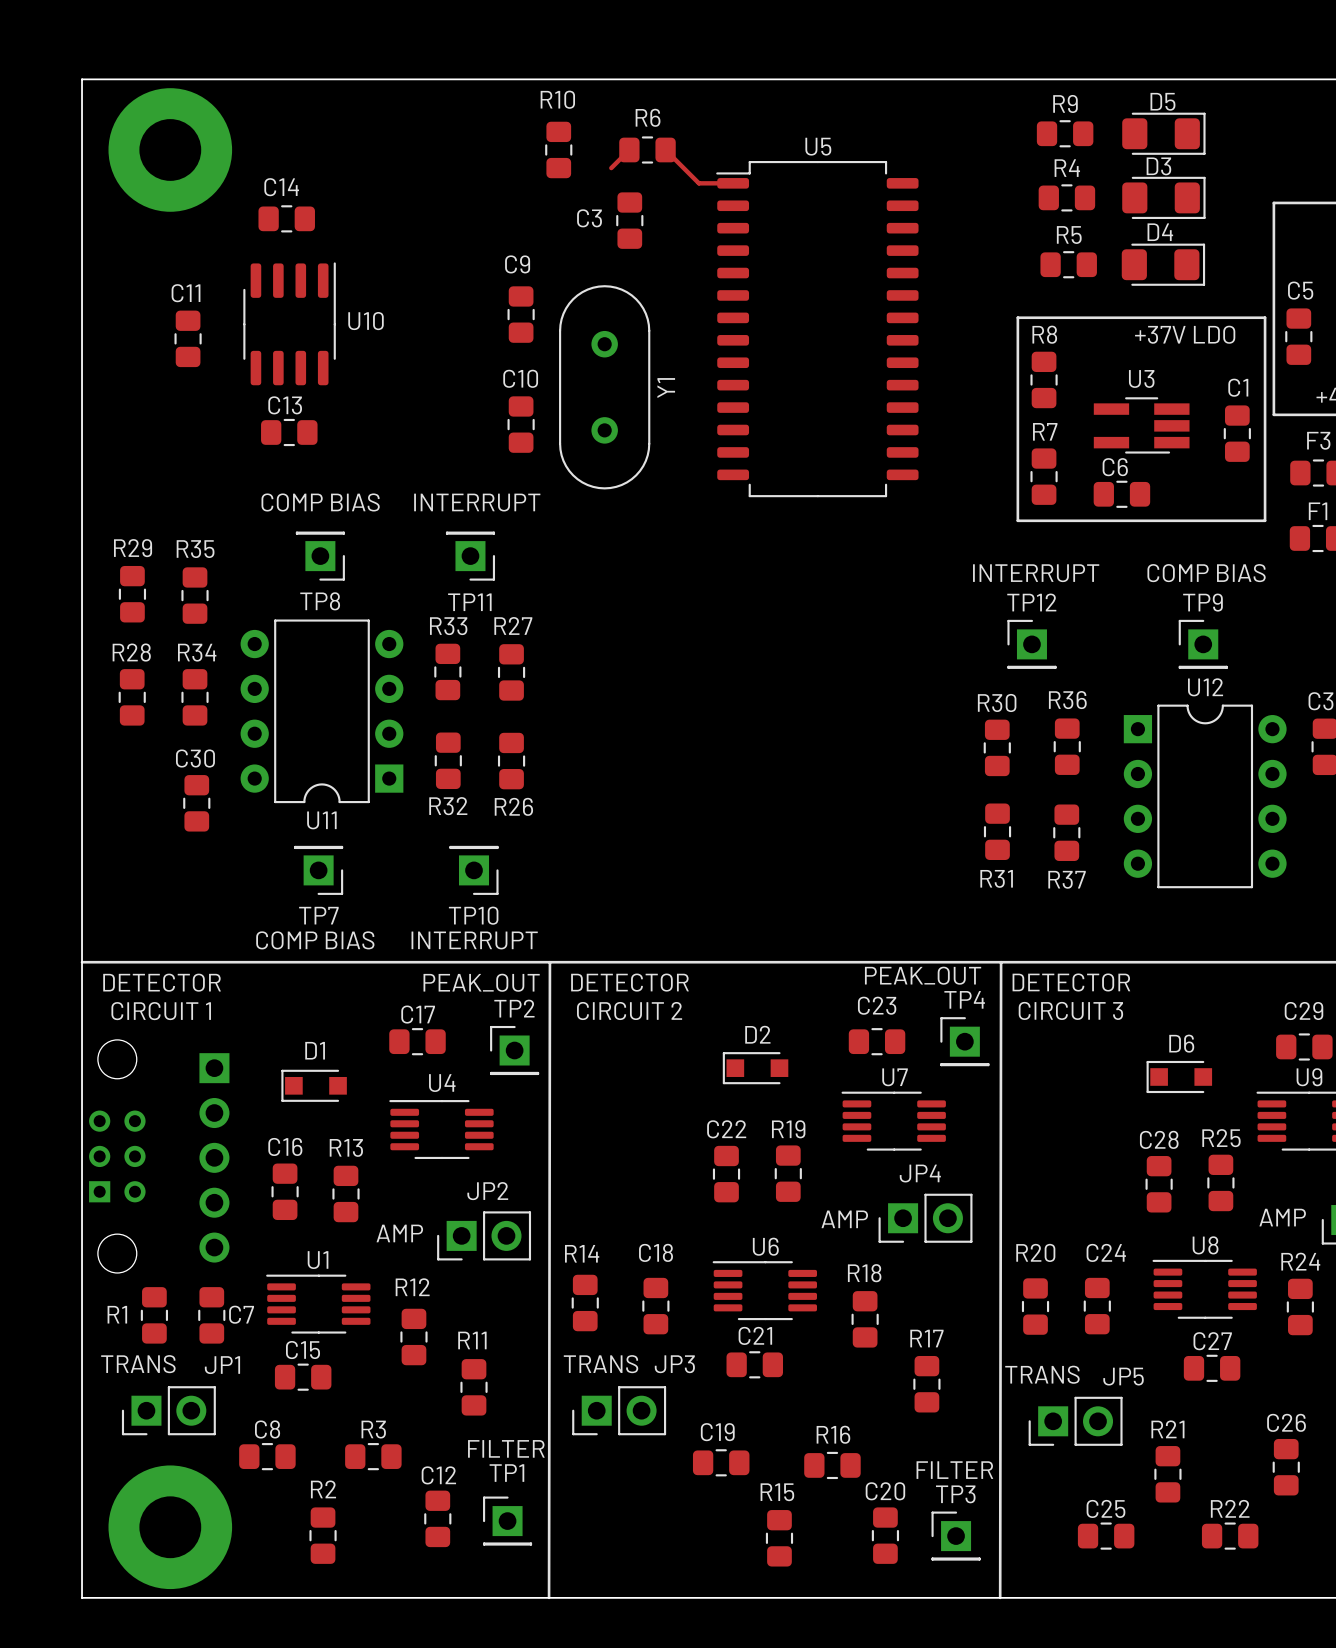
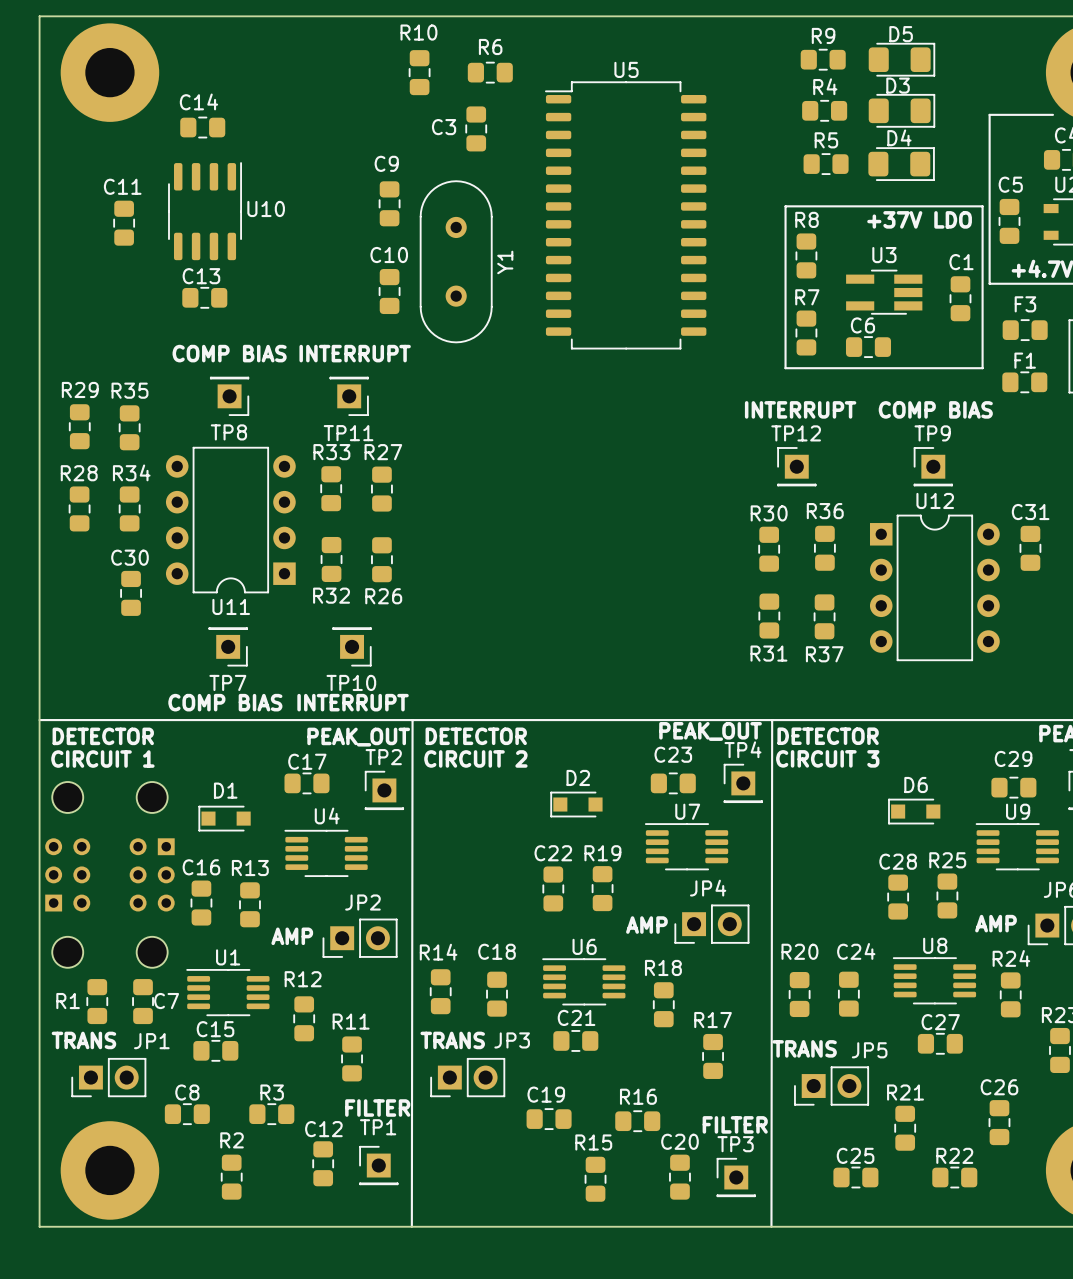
track: (629, 149) (611, 168) -> none
track: (665, 149) (698, 183) (733, 183) -> none
part footprint: [199, 1053, 230, 1263] -> [129, 781, 175, 968]

